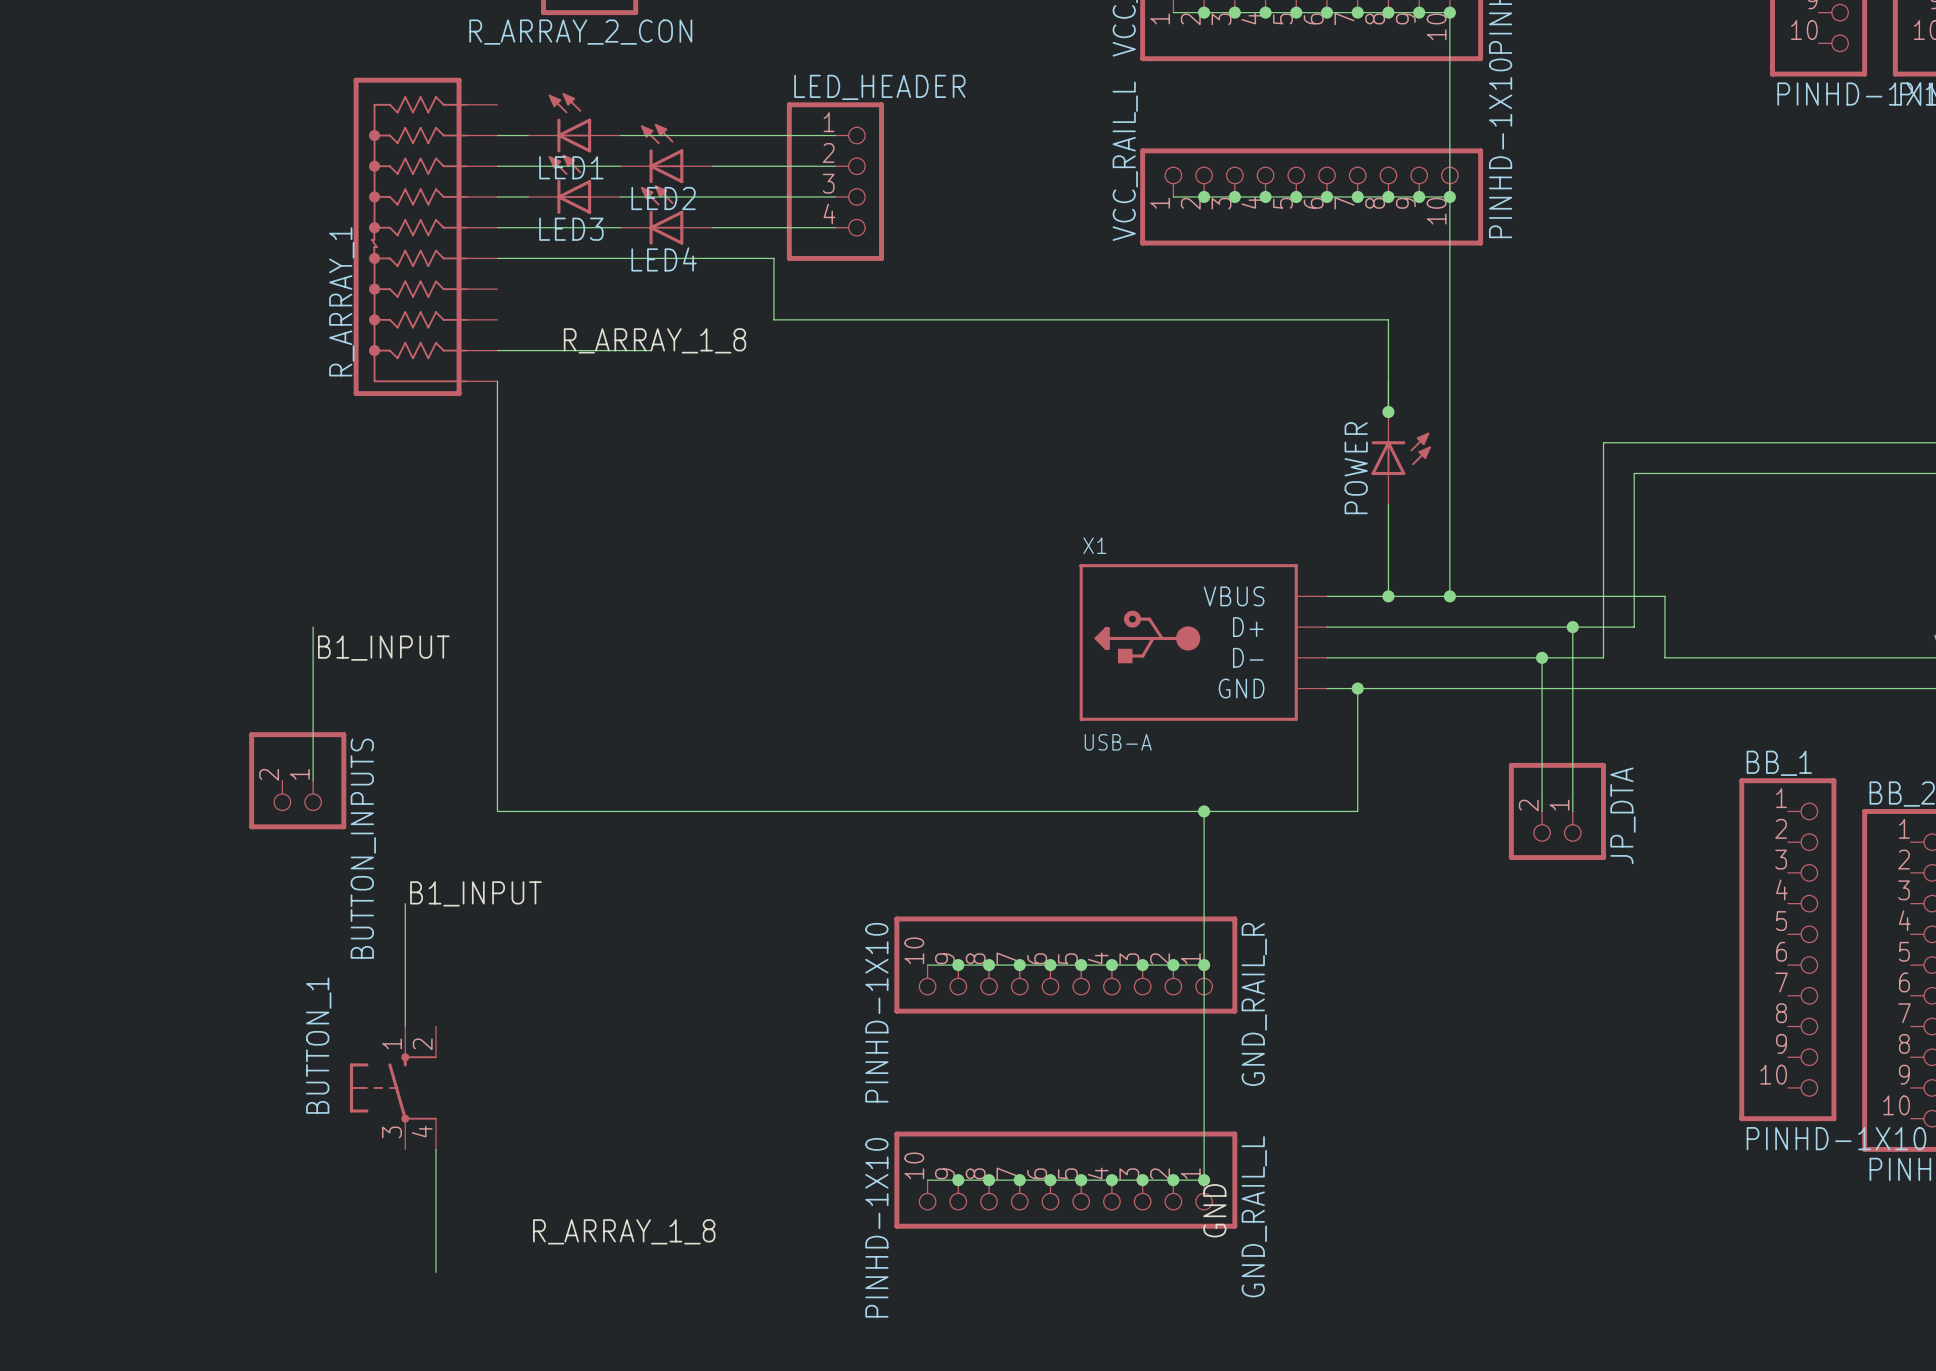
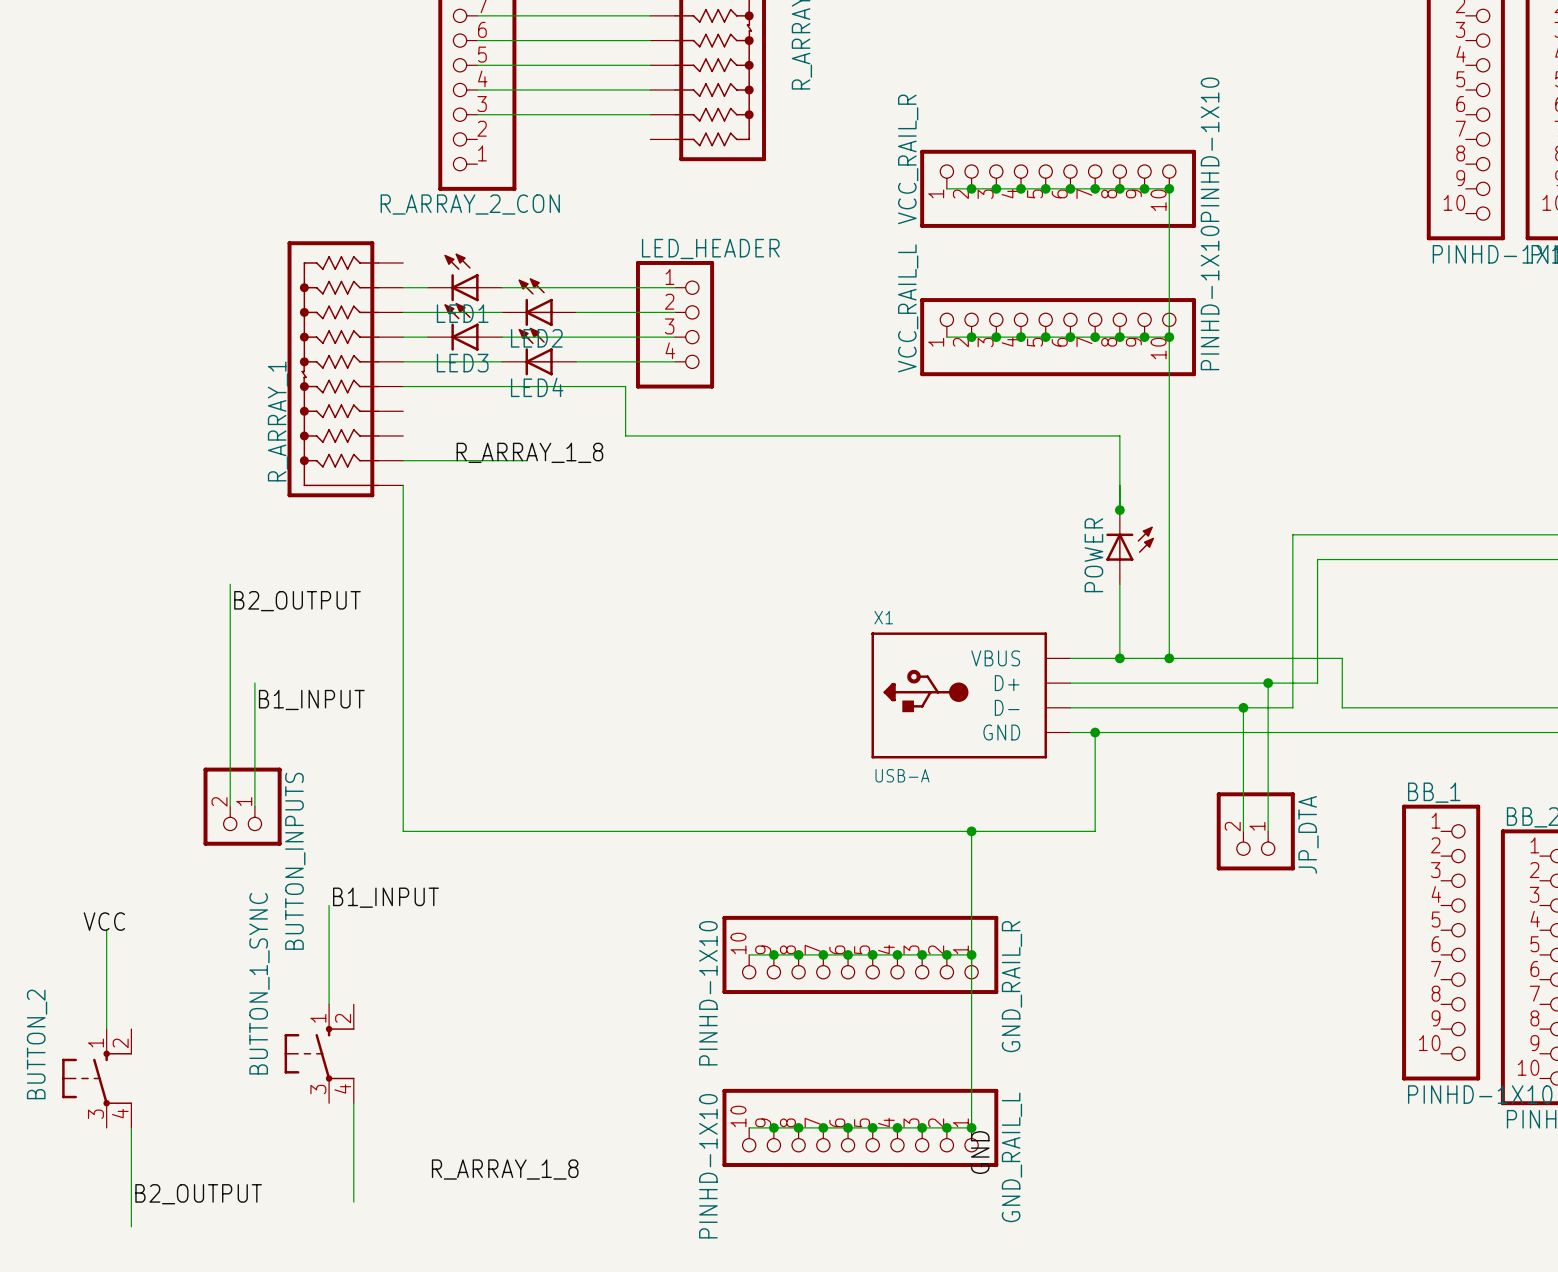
wire: none -> (230, 584) (230, 806)
label: none -> B2_OUTPUT (297, 601)
label: none -> VCC (104, 921)
wire: none -> (106, 930) (106, 1029)
BUTTON_1 name: BUTTON_1 (318, 1045) -> BUTTON_1_SYNC (259, 983)
BUTTON_2: none -> (97, 1078)
wire: none -> (131, 1127) (131, 1226)
label: none -> B2_OUTPUT (198, 1194)

